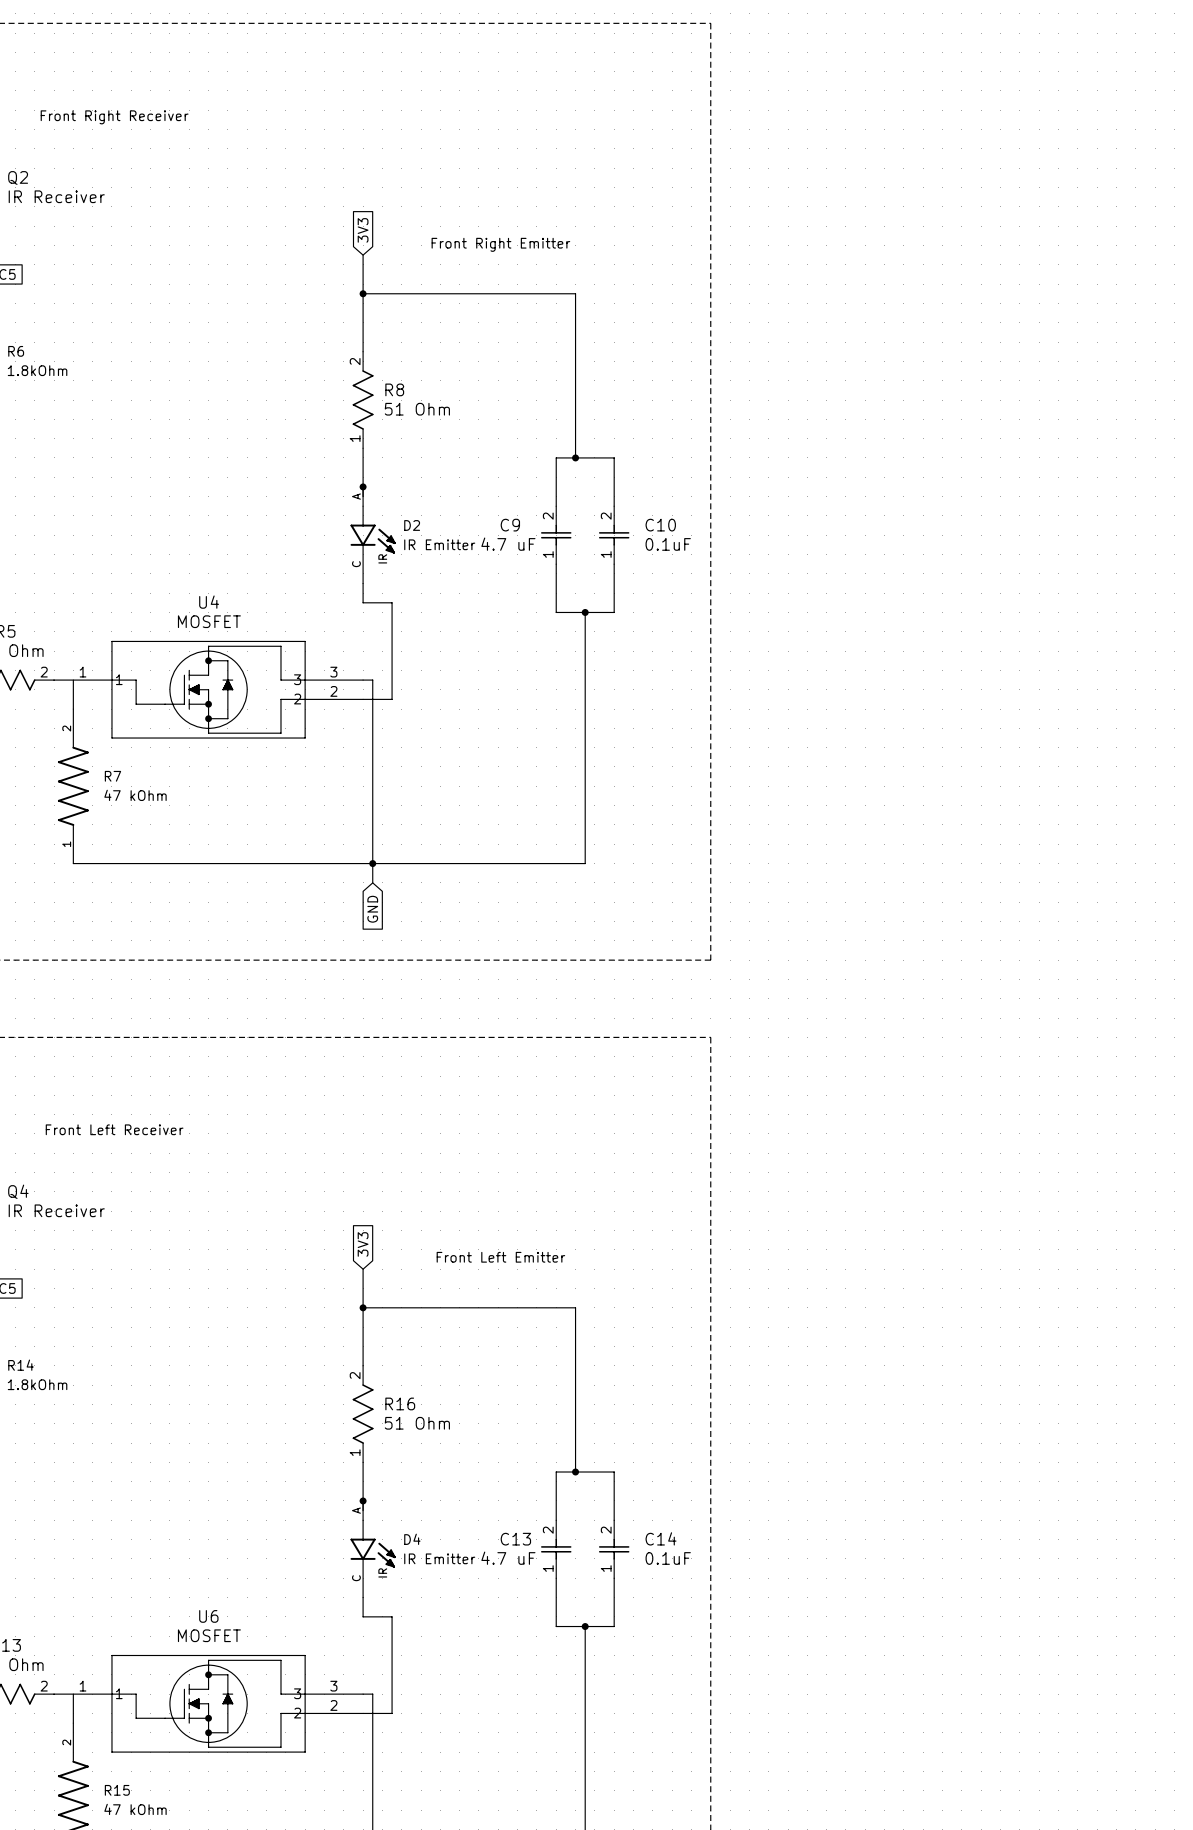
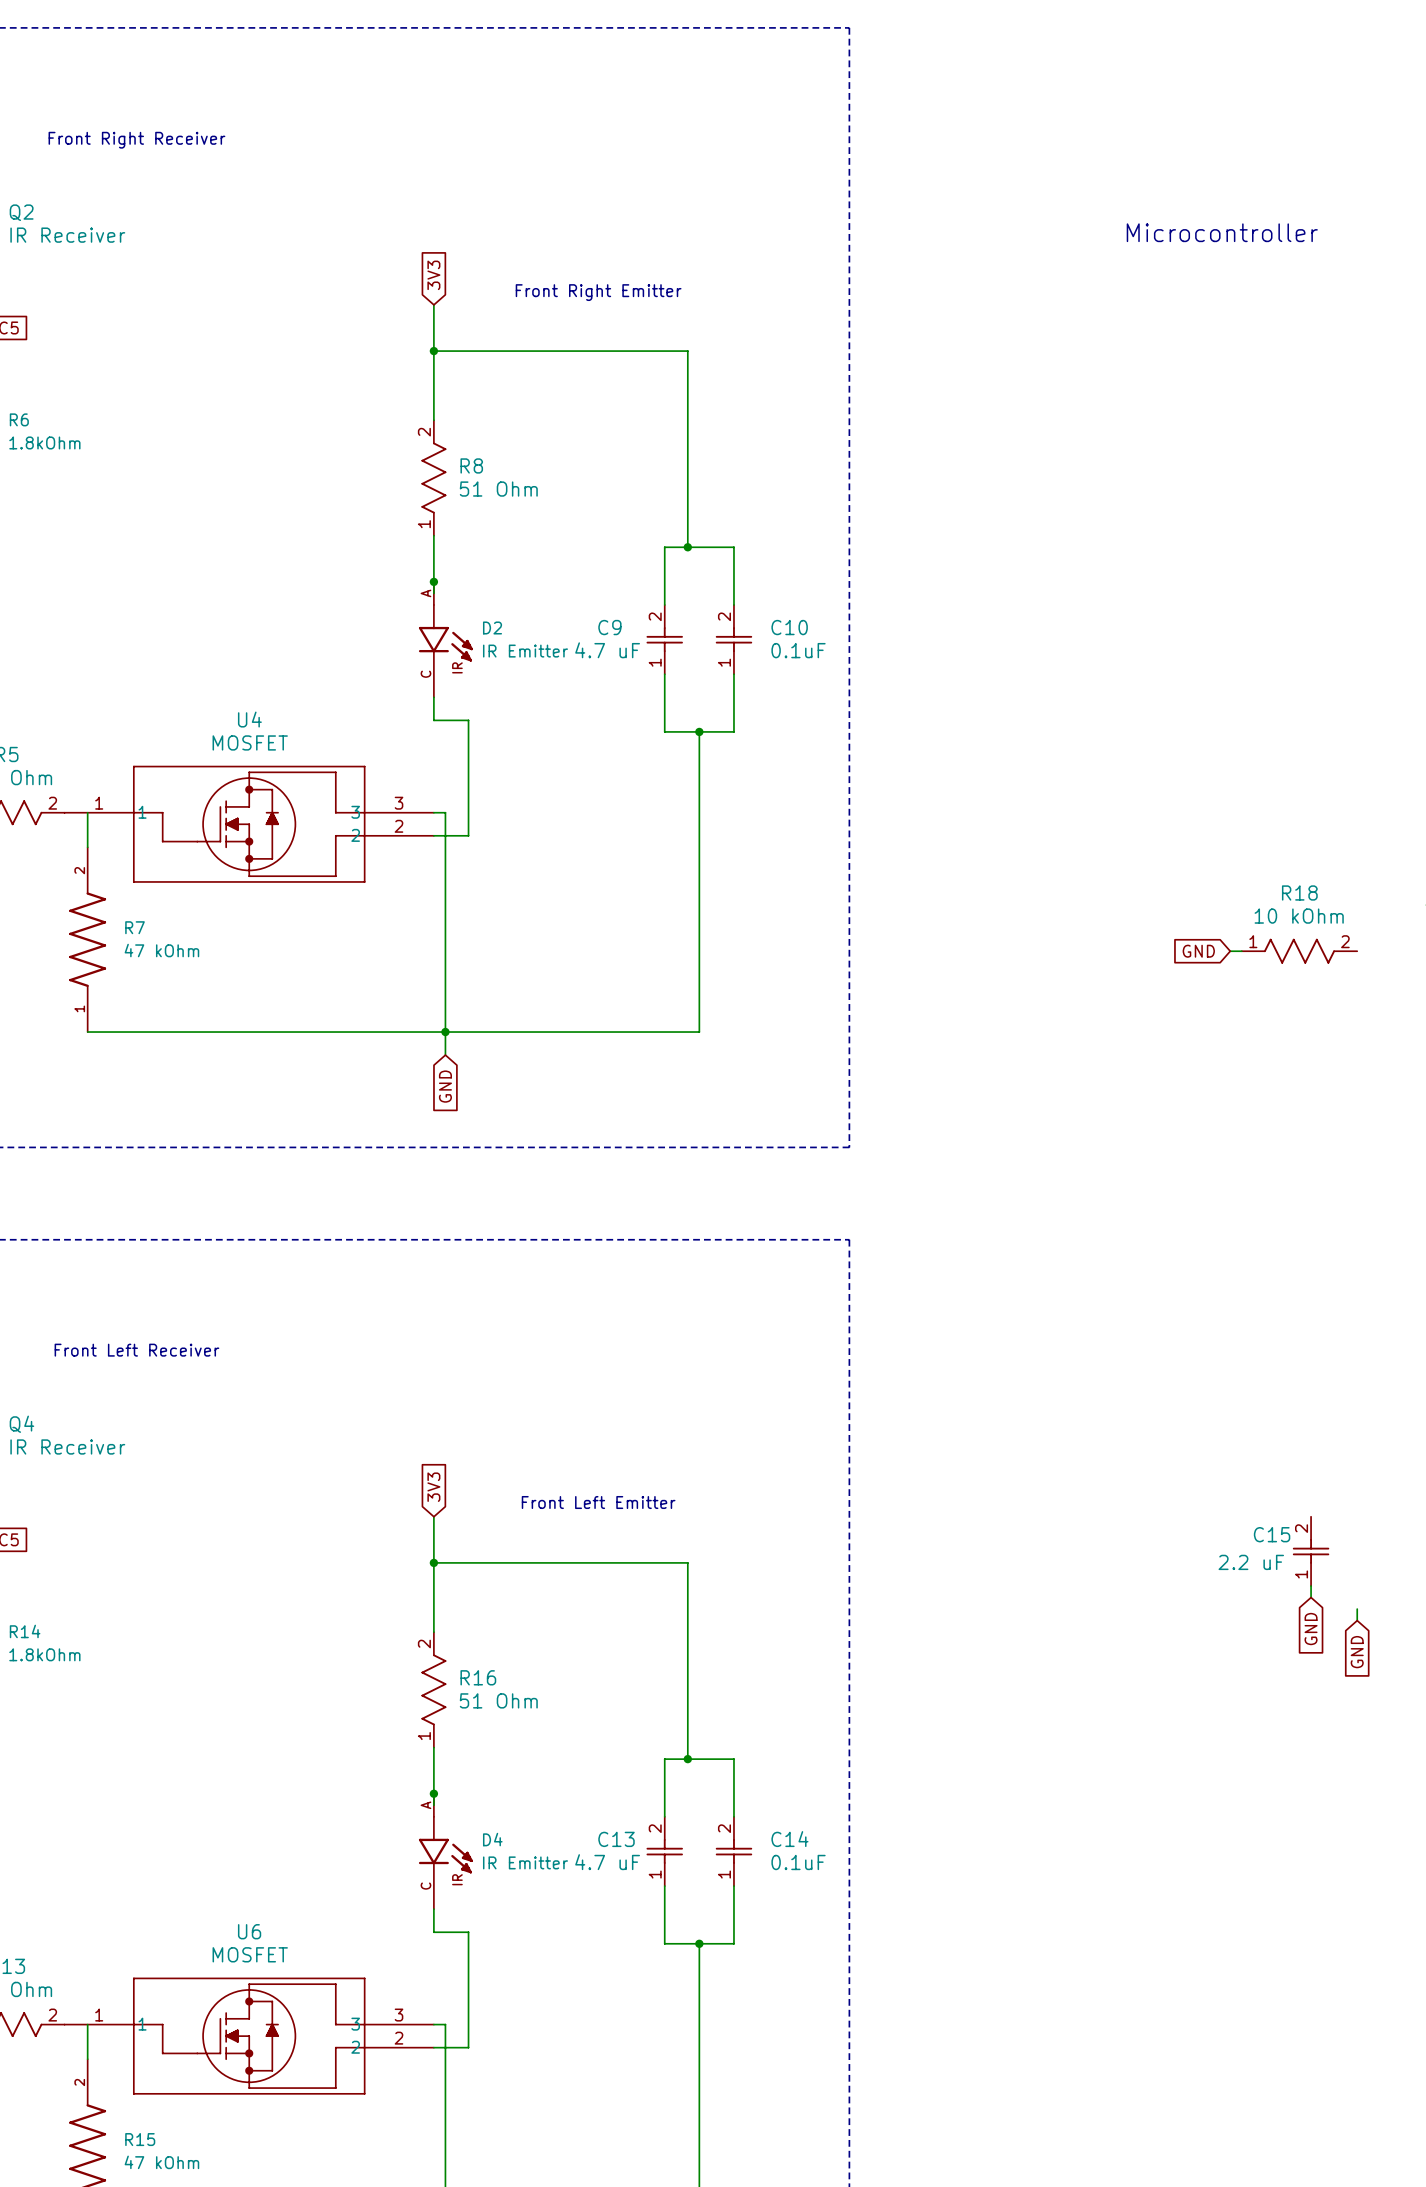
text: none -> Microcontroller (1222, 232)
global label: none -> GND (1198, 951)
wire: none -> (1230, 951) (1241, 951)
R18: none -> 10 kOhm (1299, 951)
C15: none -> 2.2 uF (1311, 1551)
wire: none -> (1311, 1586) (1311, 1597)
wire: none -> (1357, 1609) (1357, 1620)
global label: none -> GND (1311, 1629)
global label: none -> GND (1357, 1652)

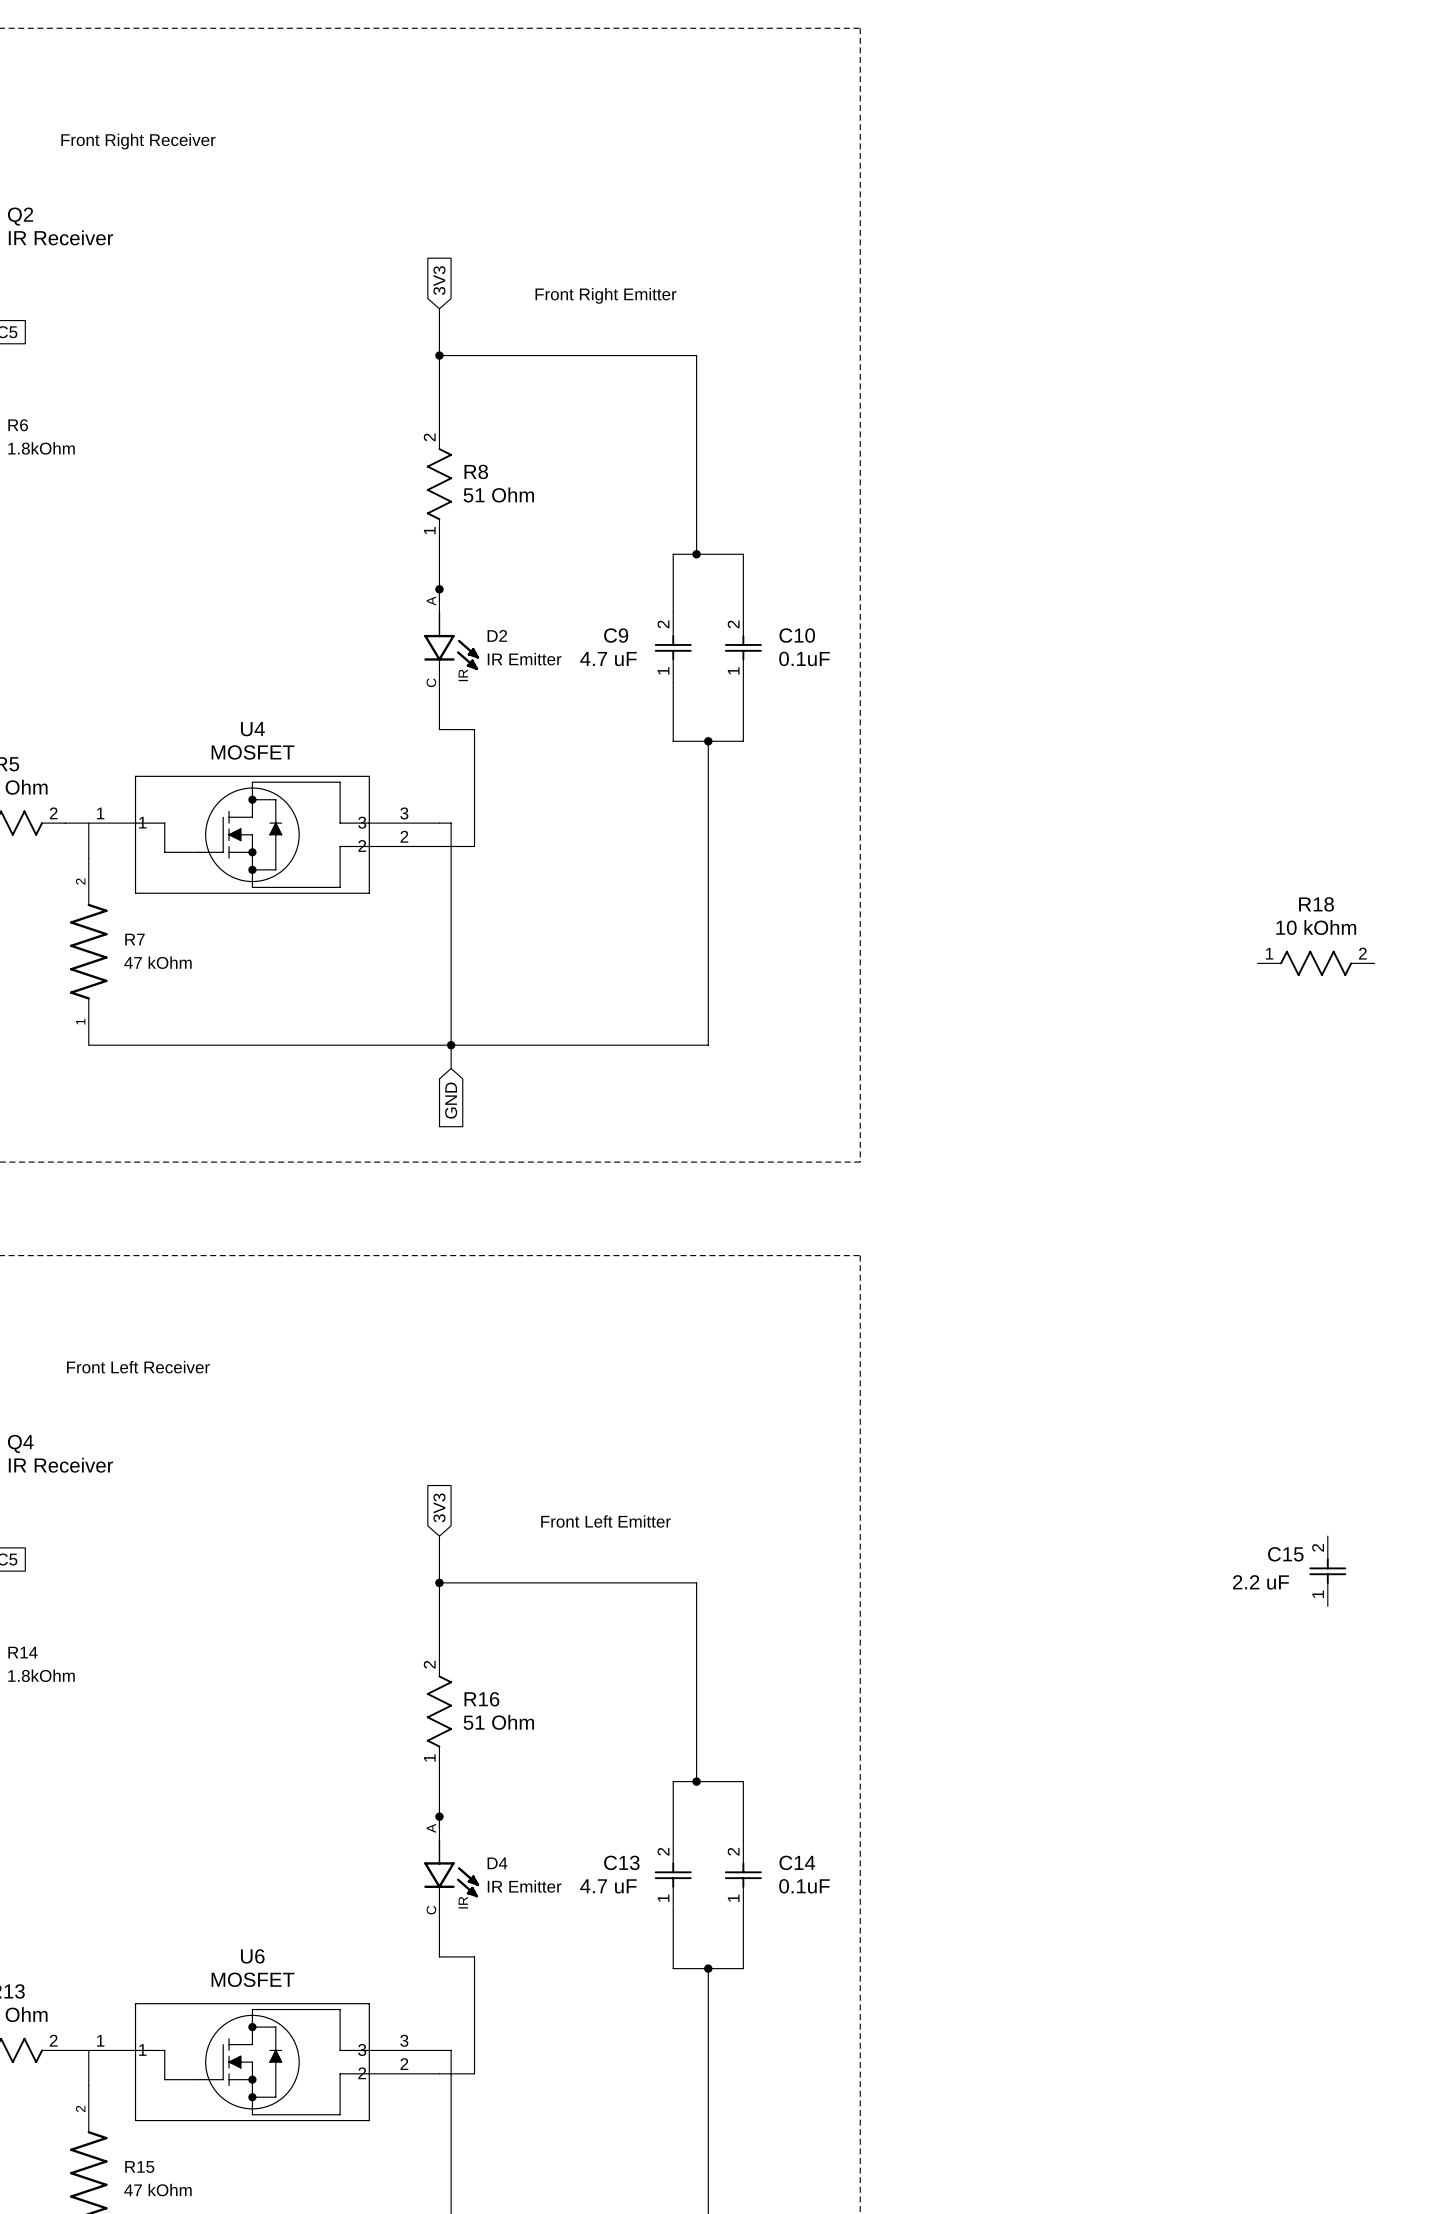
text: Microcontroller (1222, 232) -> none
global label: GND (1198, 951) -> none
wire: (1230, 951) (1241, 951) -> none
wire: (1311, 1586) (1311, 1597) -> none
wire: (1357, 1609) (1357, 1620) -> none
global label: GND (1311, 1629) -> none
global label: GND (1357, 1652) -> none

